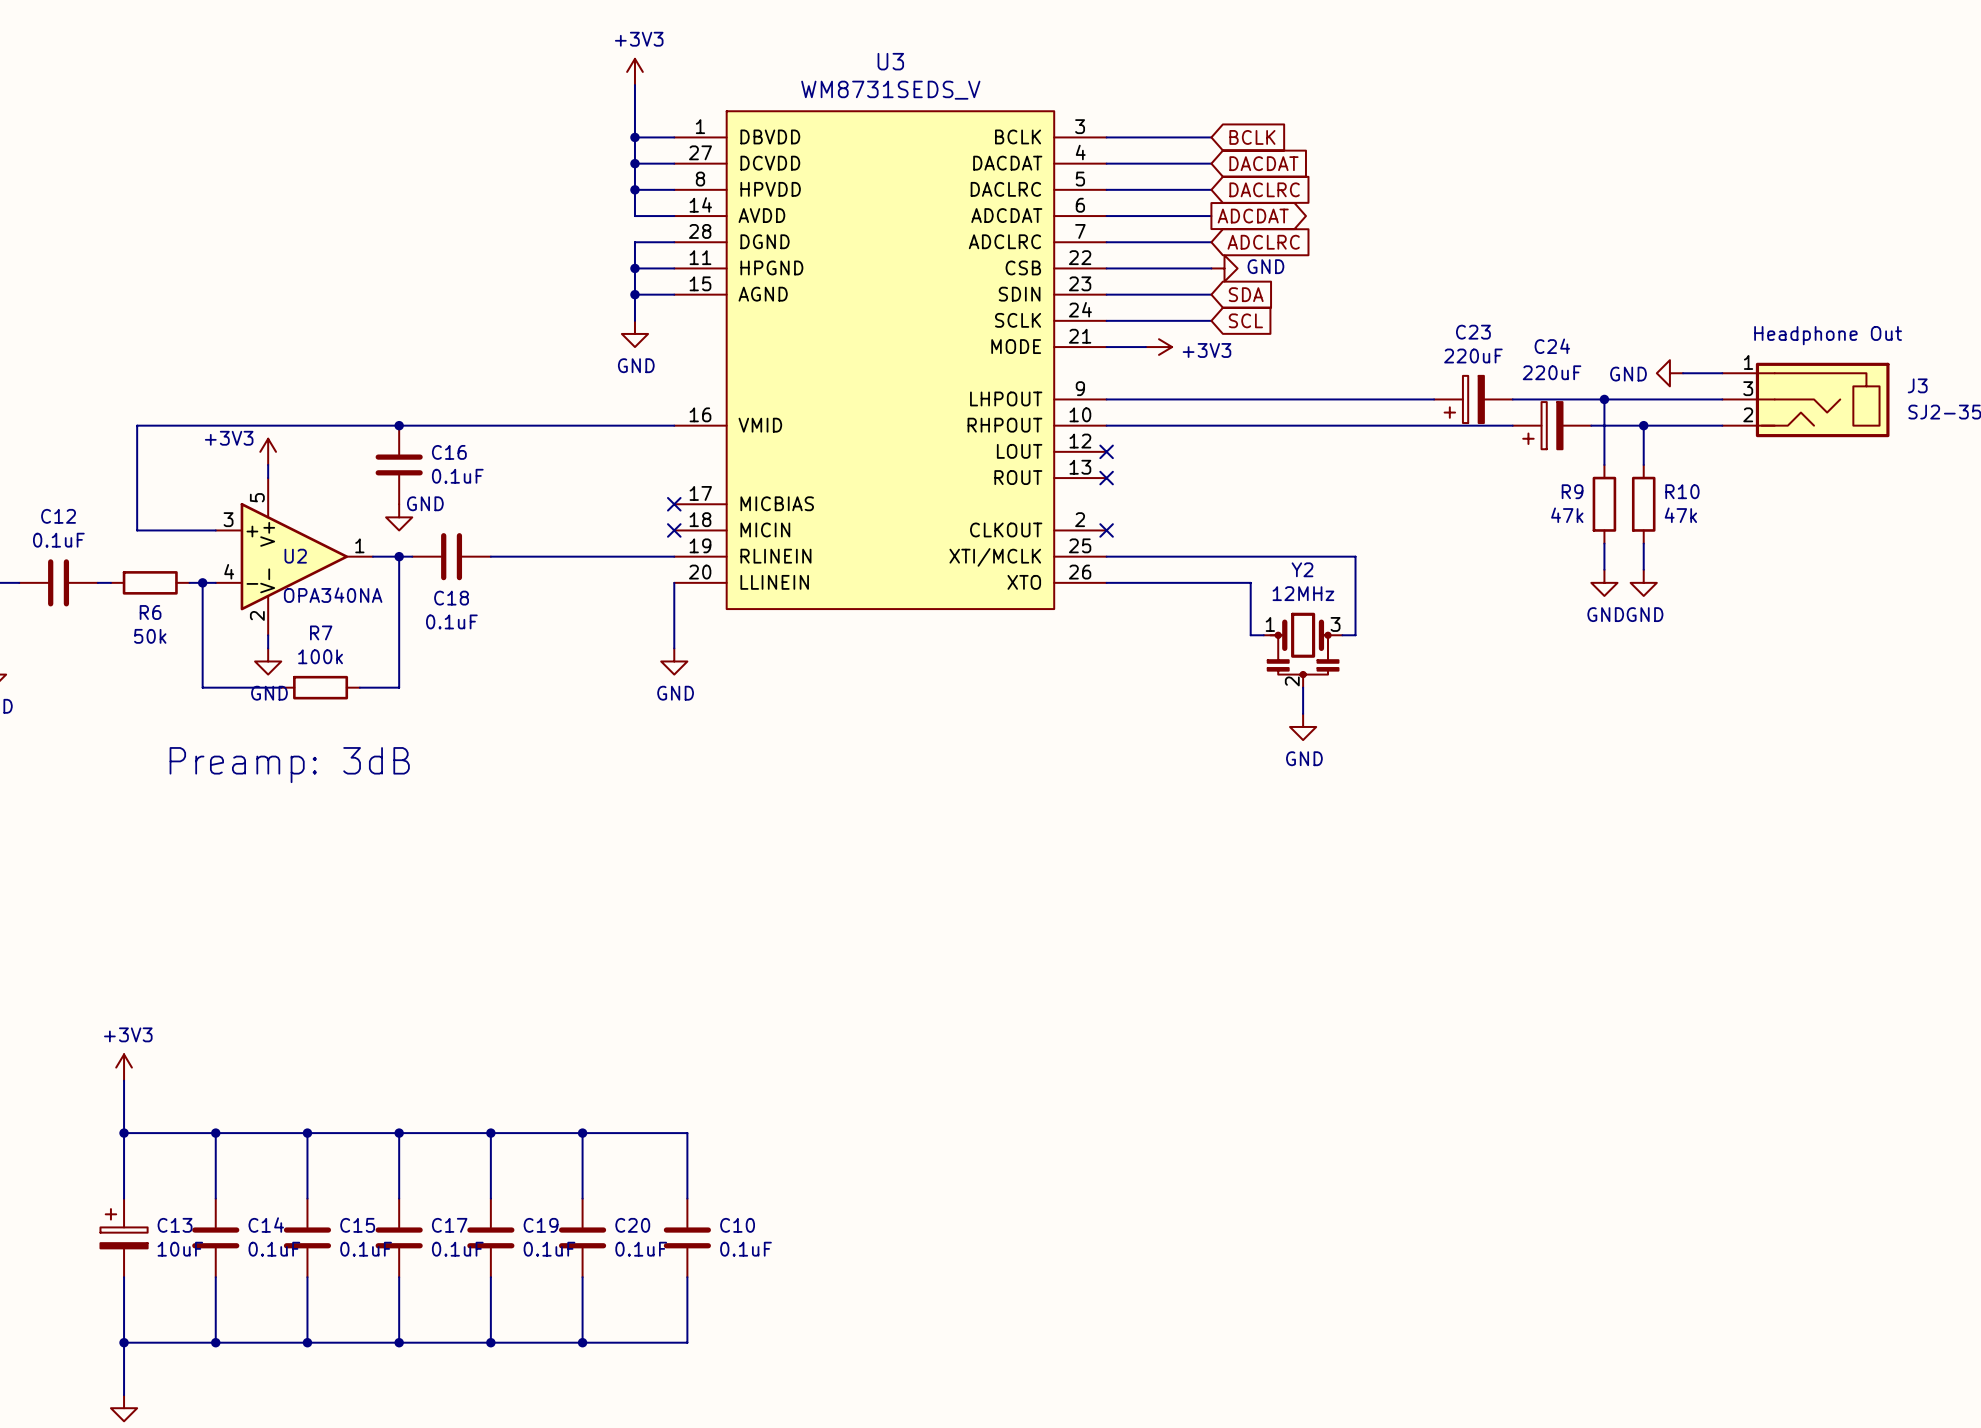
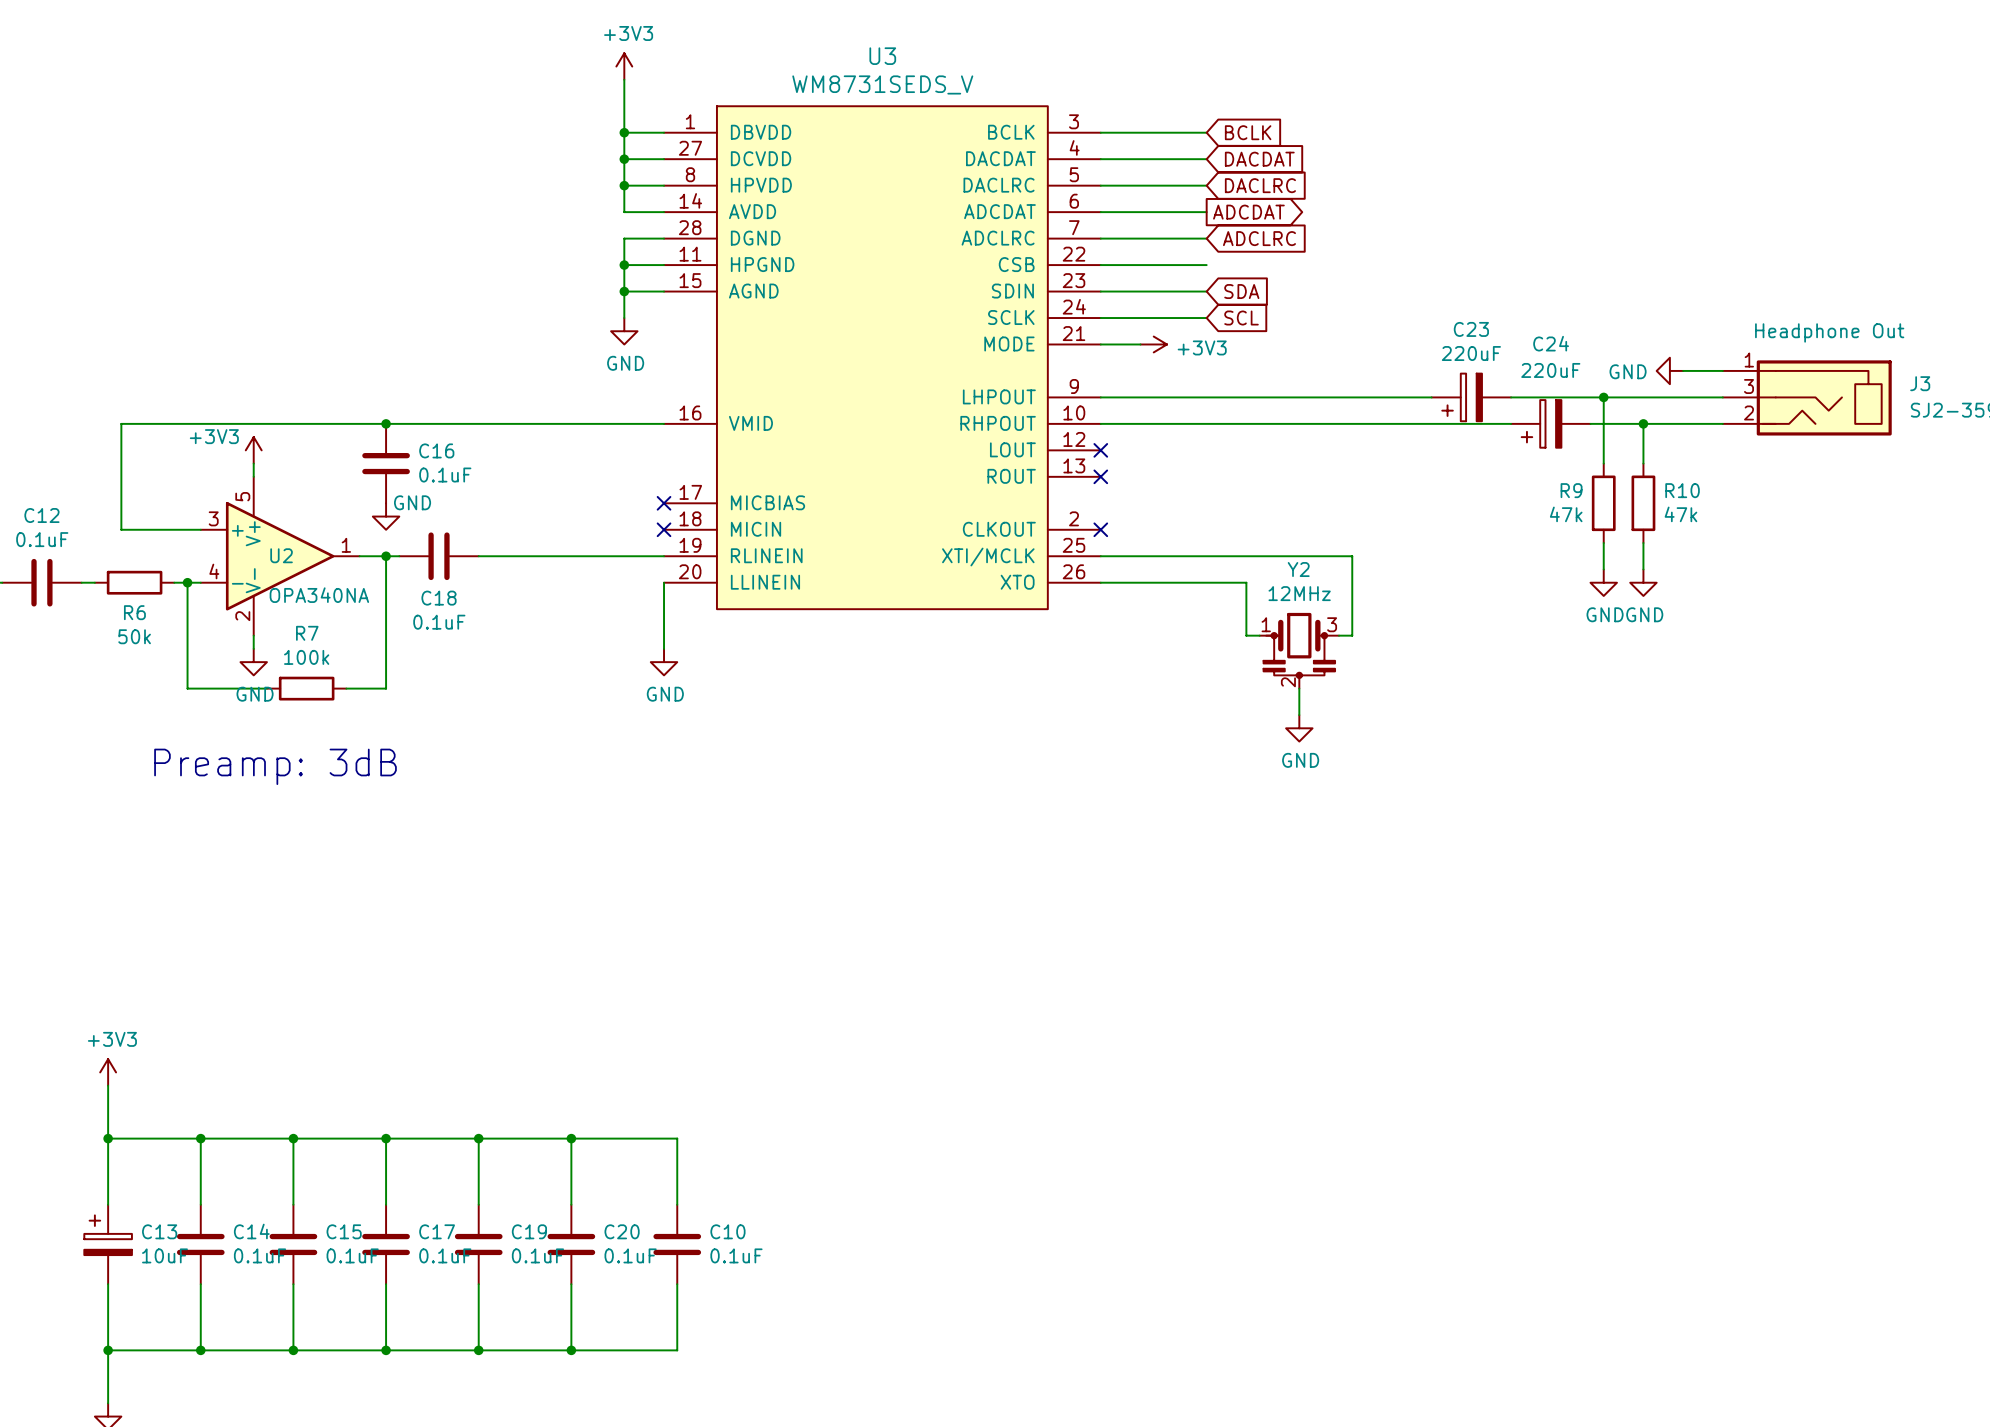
power symbol: GND (1224, 268) -> none

